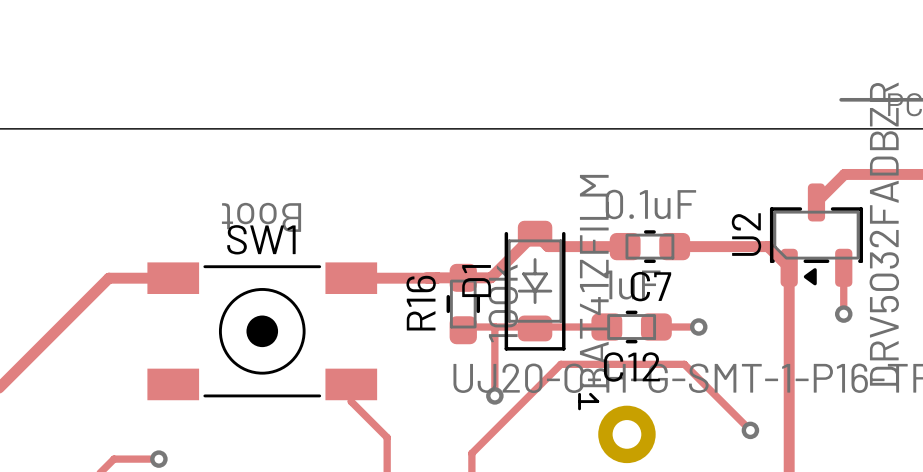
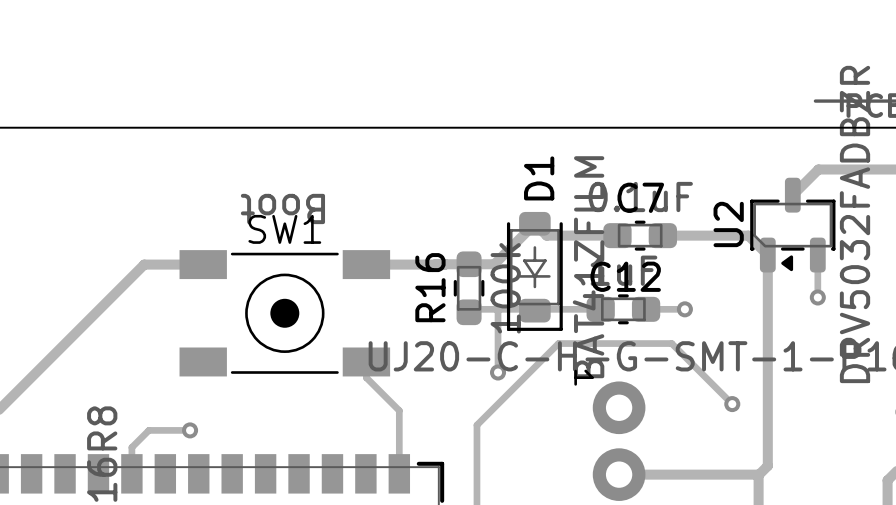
D1 name position: D1 (476, 281) -> D1 (539, 178)
C7 name position: C7 (650, 286) -> C7 (640, 197)
C12 name position: C12 (631, 367) -> C12 (625, 276)

